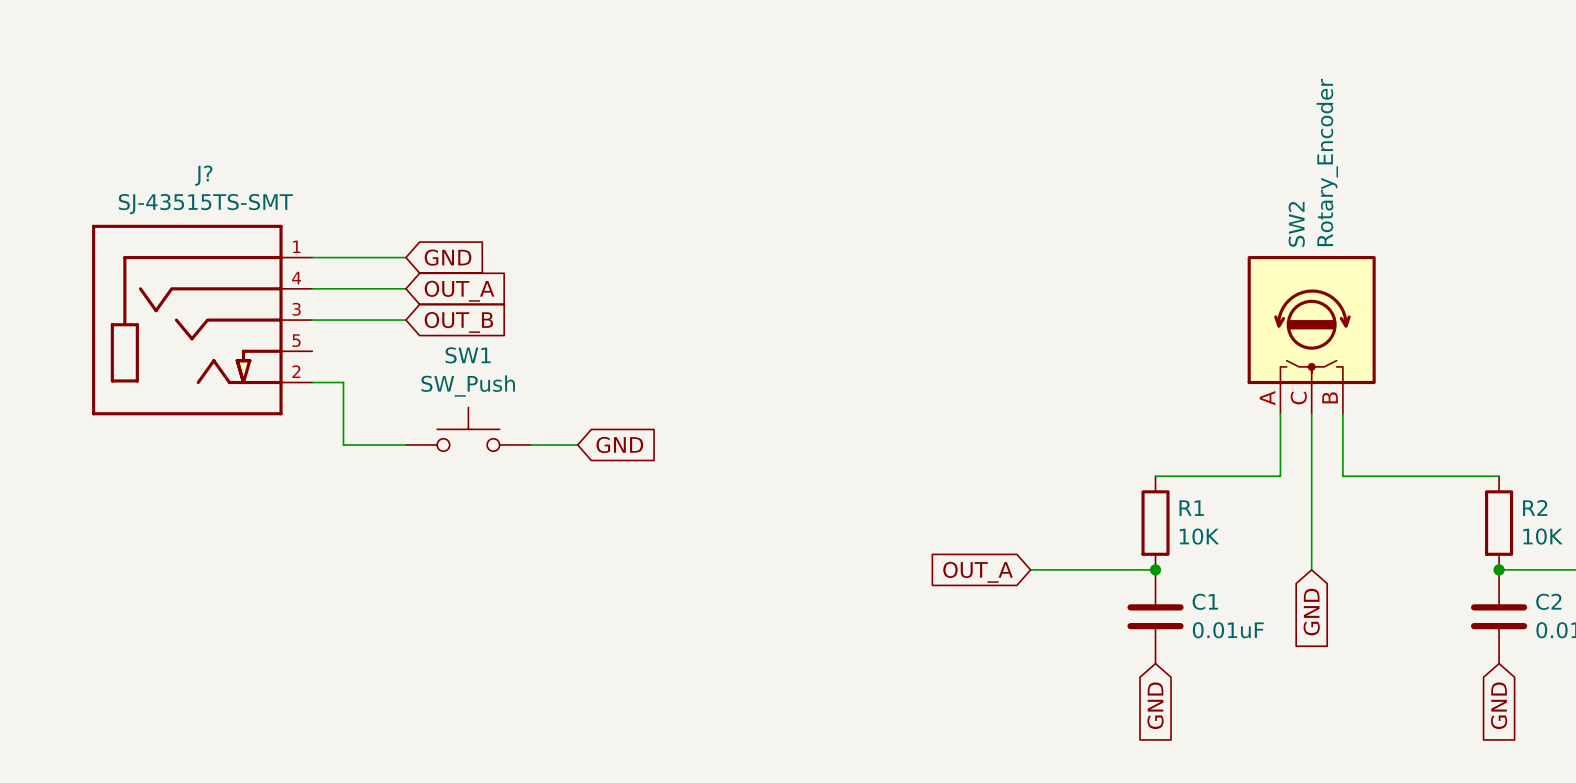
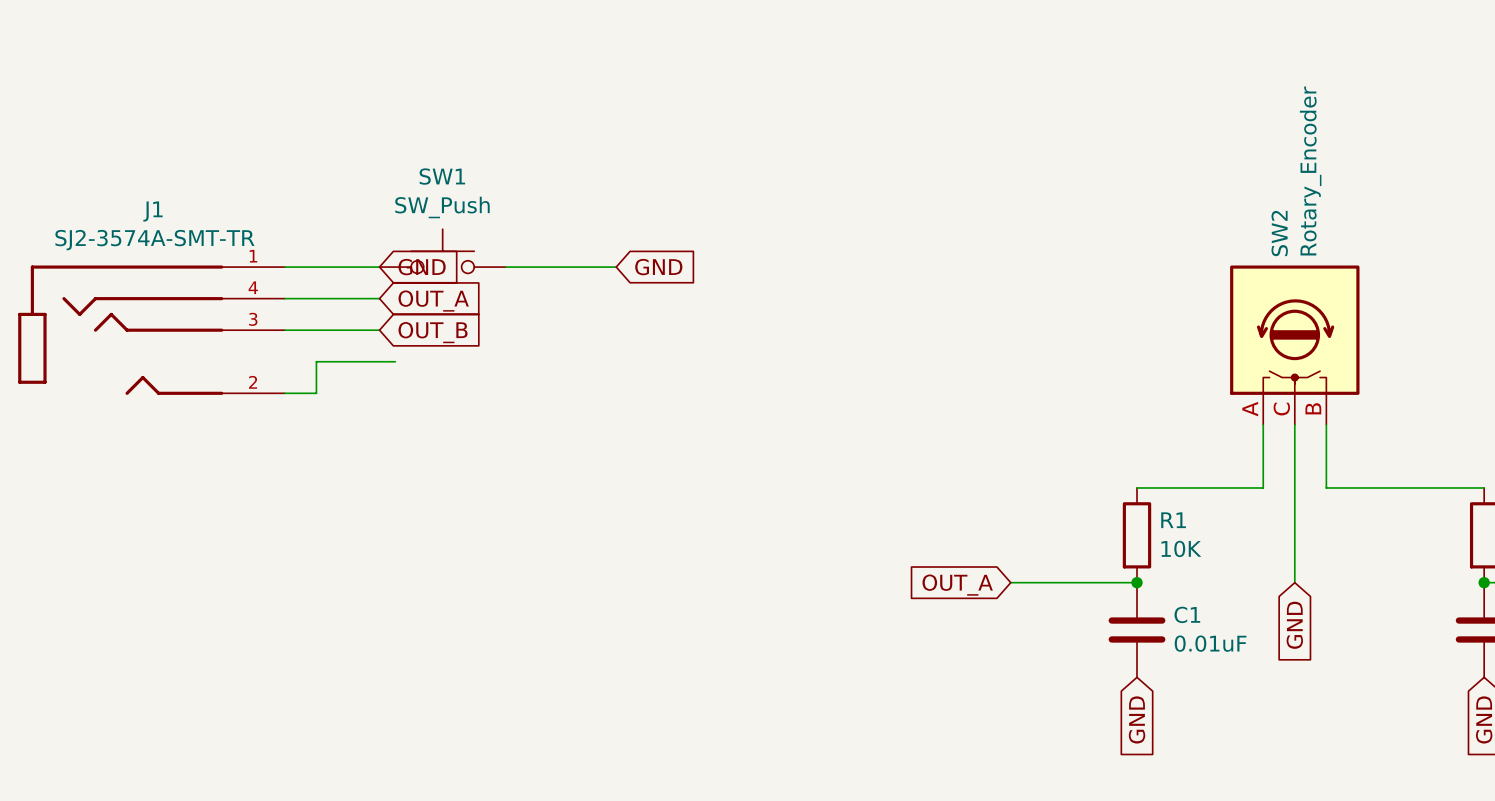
wire: none -> (505, 267) (616, 267)
J1: none -> SJ2-3574A-SMT-TR (151, 330)
J?: SJ-43515TS-SMT (202, 320) -> none
wire: (343, 382) (343, 444) (405, 444) -> (316, 393) (316, 361) (395, 361)
SW1 position: (468, 429) -> (442, 251)
wire: (530, 444) (577, 444) -> none
global label position: GND (619, 444) -> GND (658, 267)

